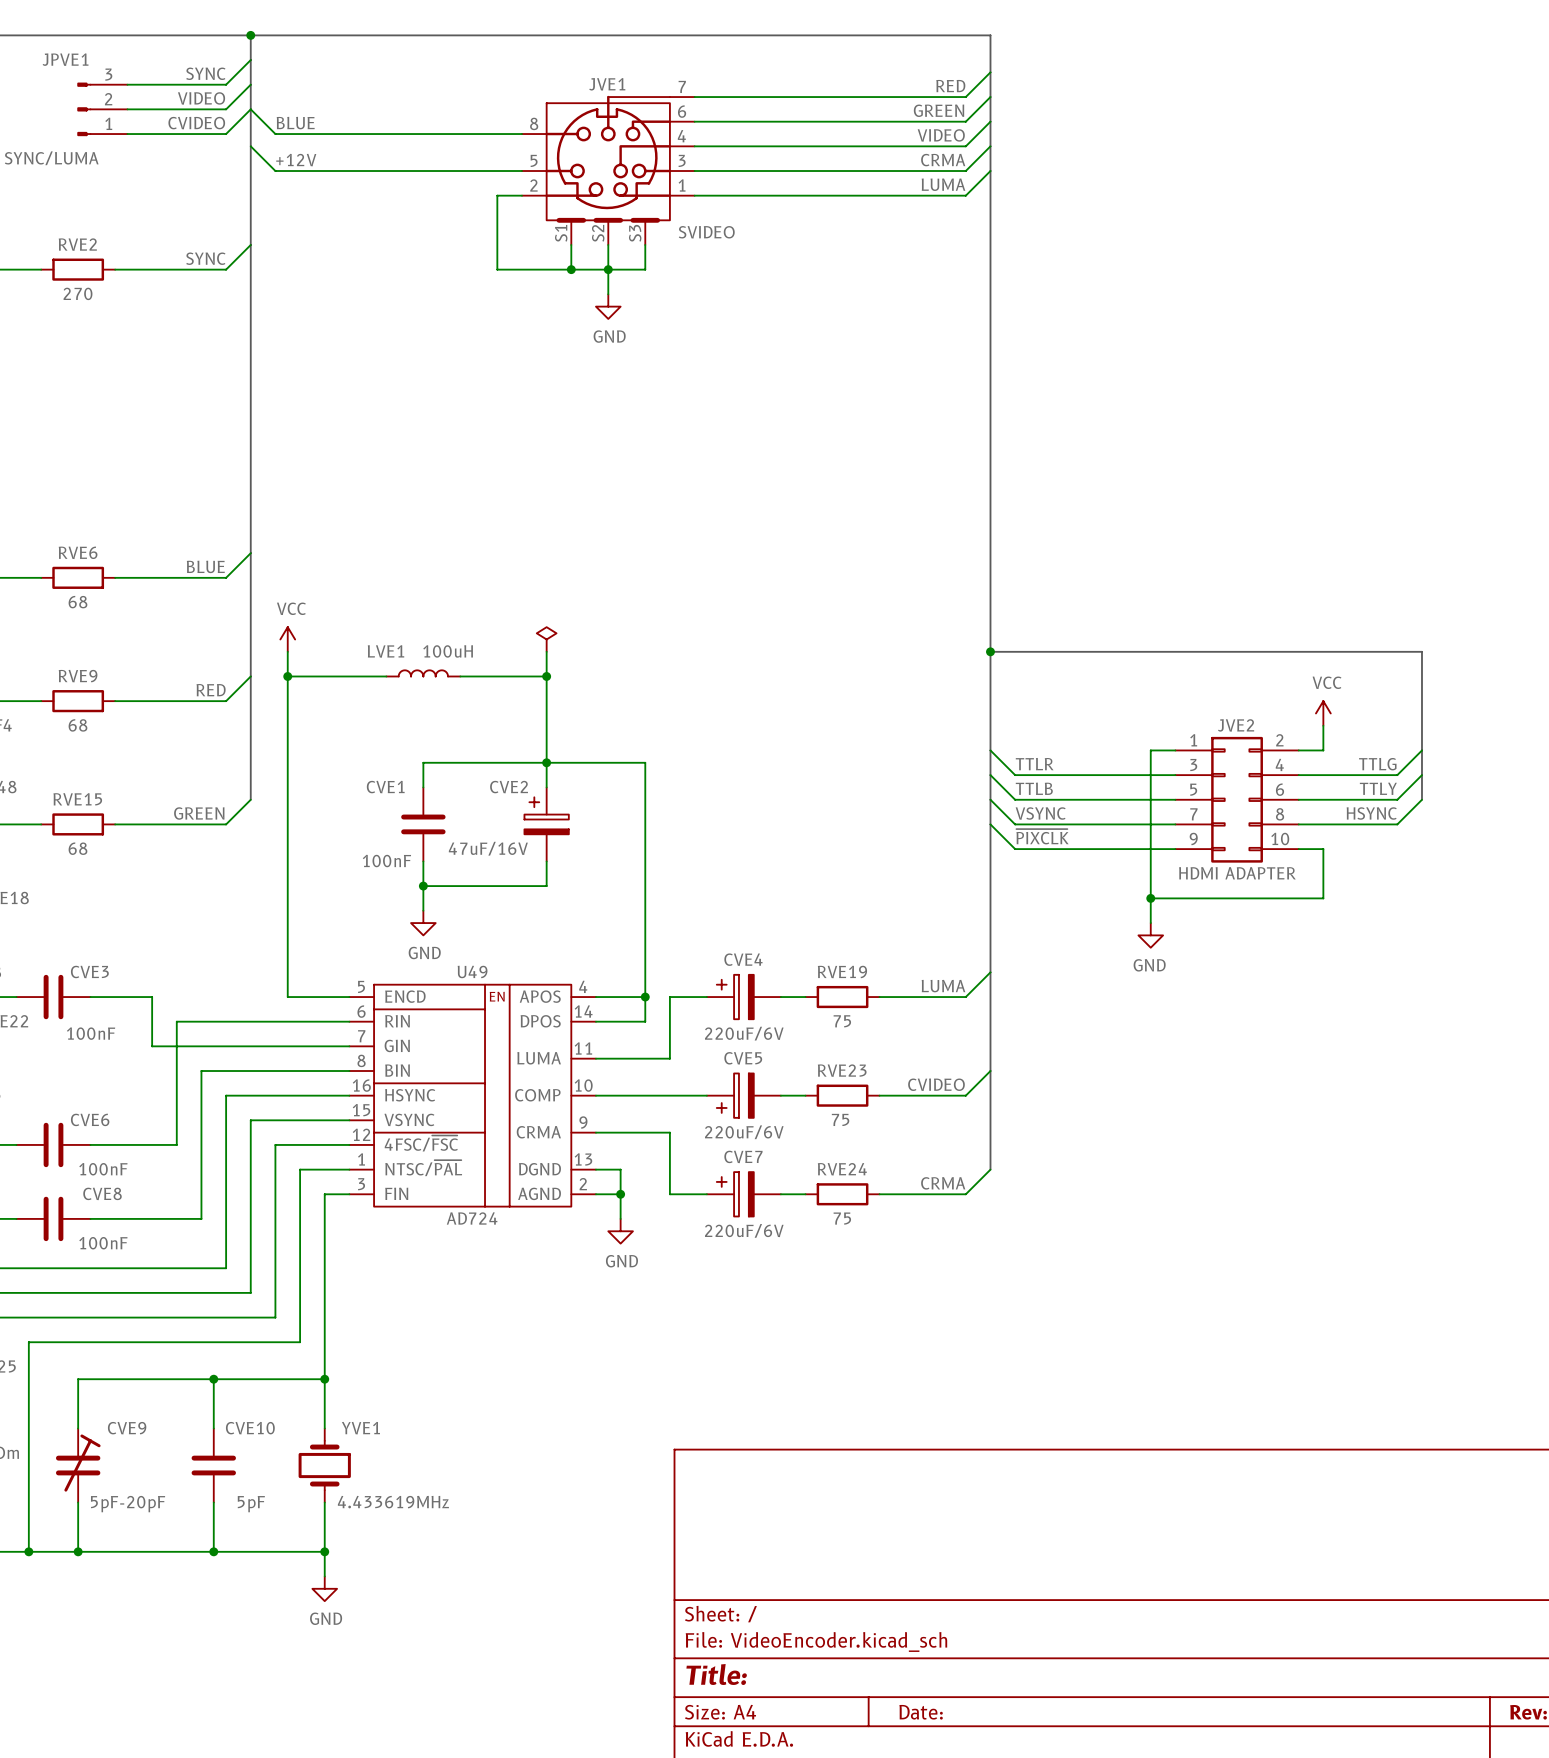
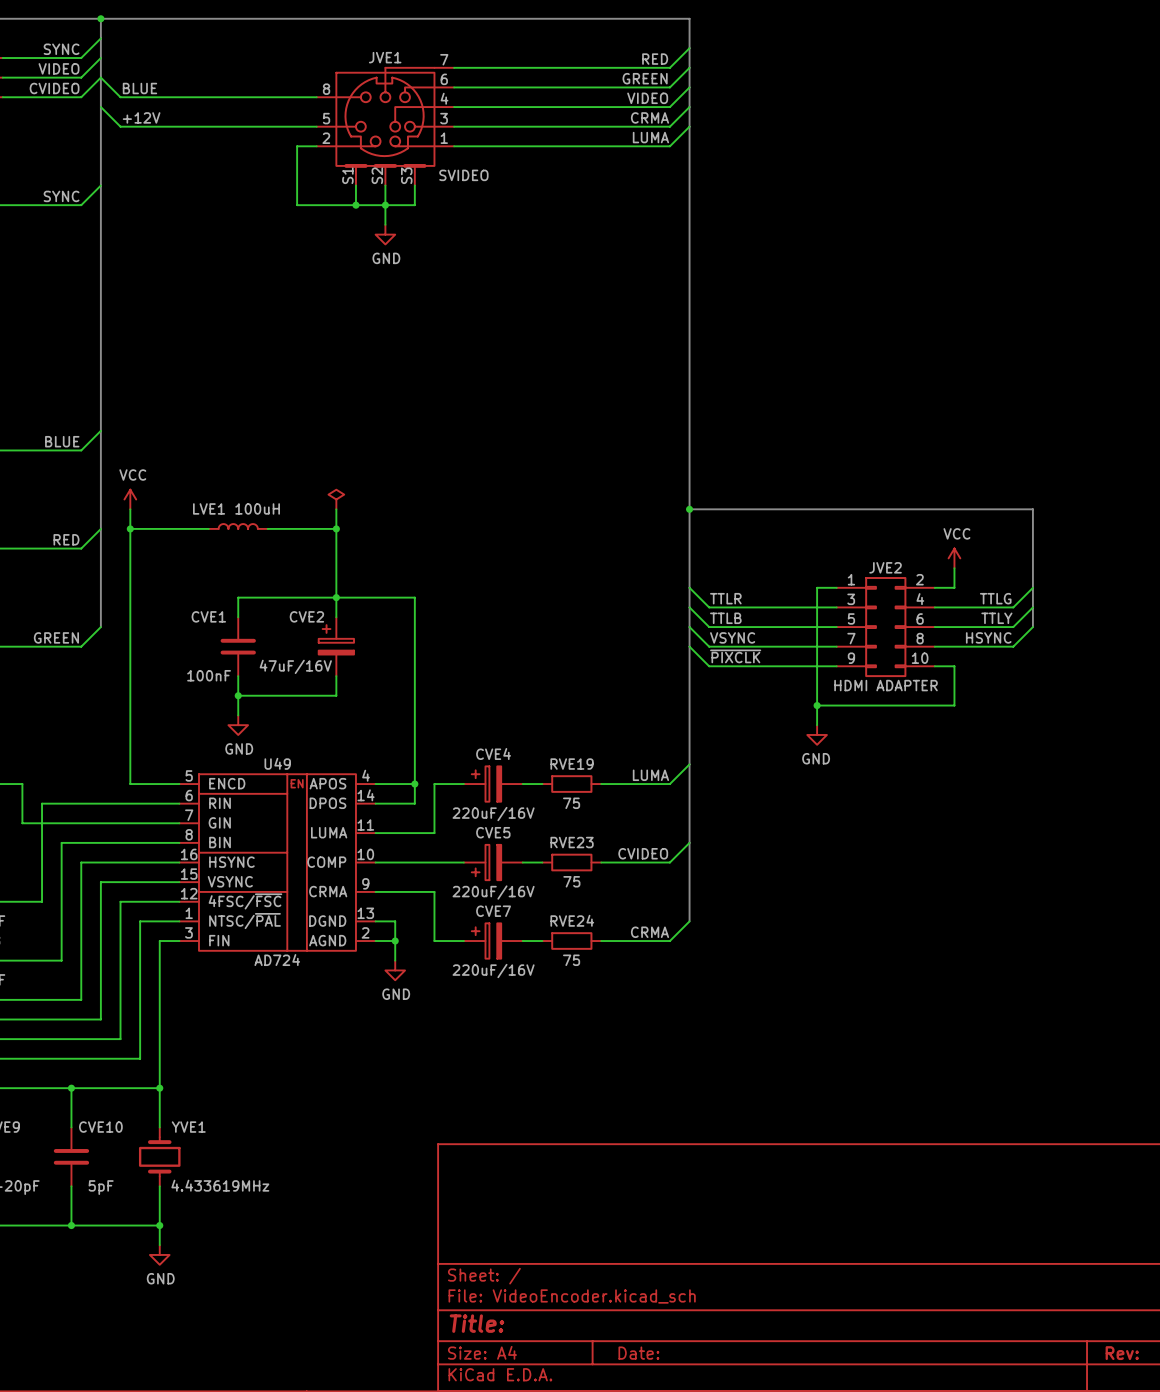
CVE4 value: 220uF/6V (744, 1033) -> 220uF/16V (493, 814)
CVE5 value: 220uF/6V (744, 1132) -> 220uF/16V (493, 892)
CVE7 value: 220uF/6V (744, 1230) -> 220uF/16V (493, 971)

